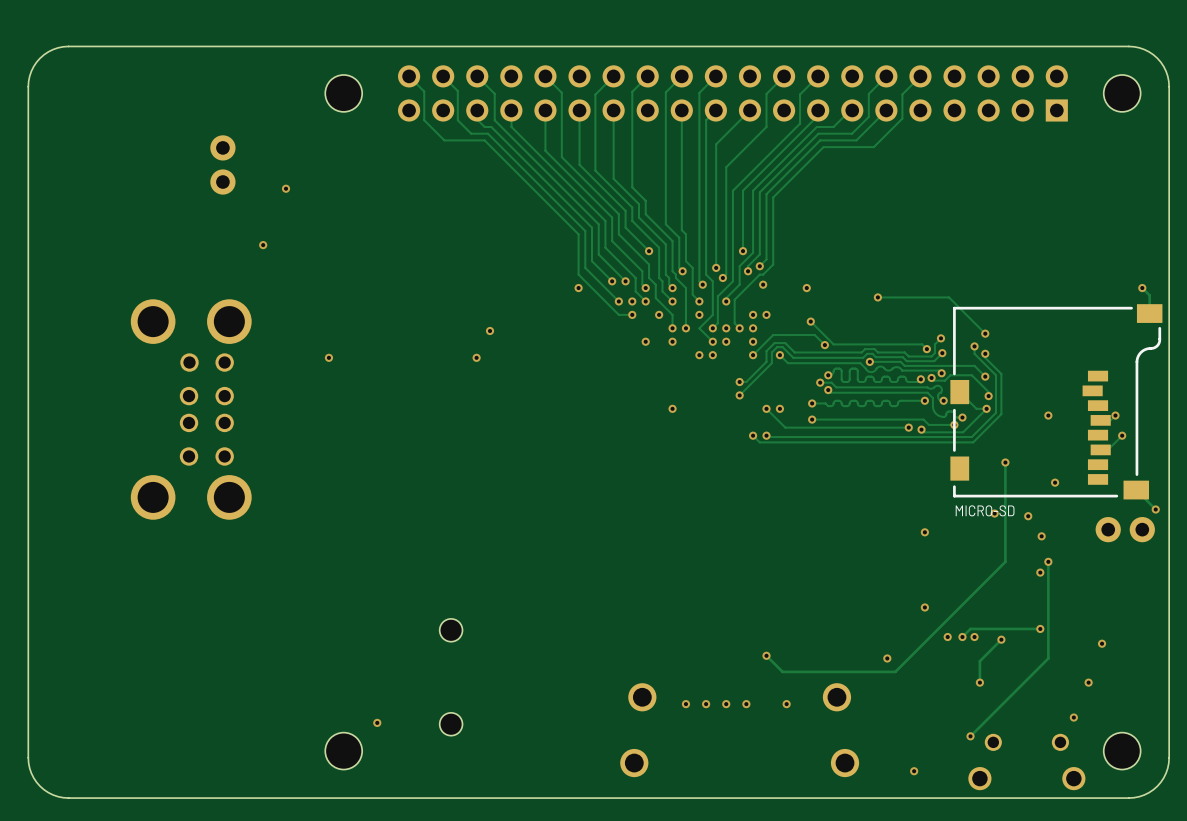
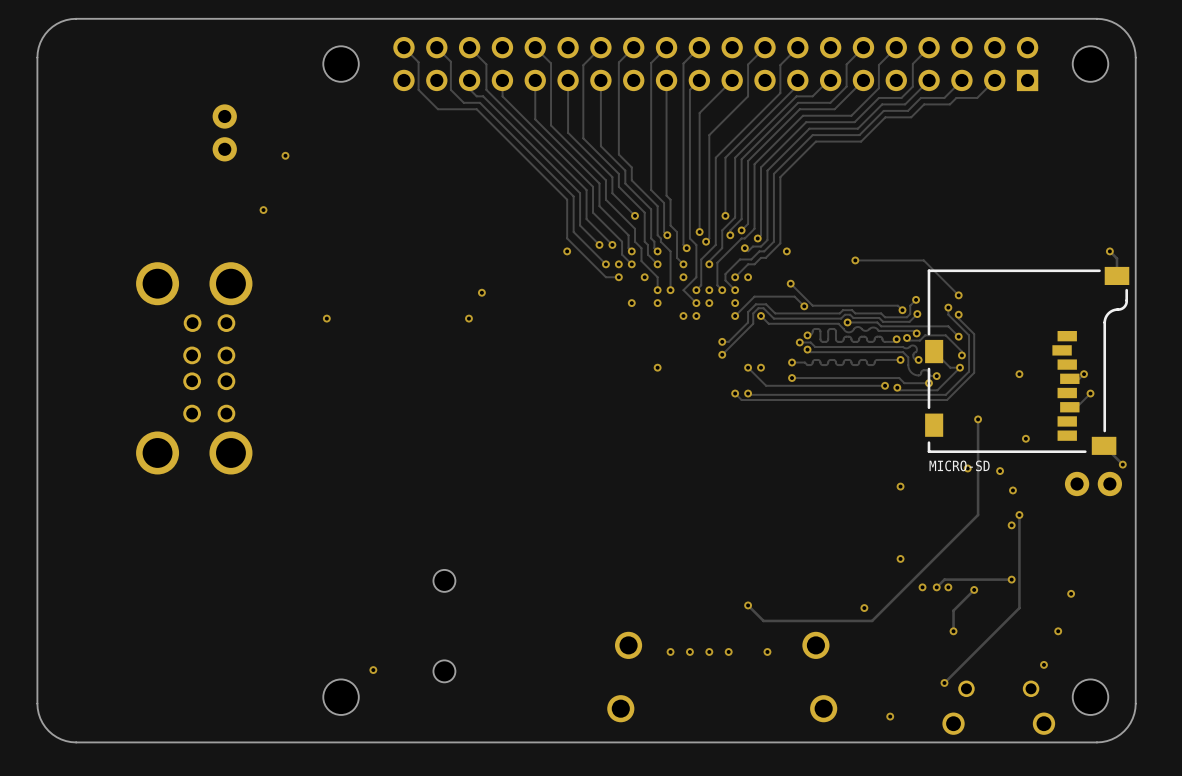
track: none -> (929, 47) (912, 63) (912, 86) (901, 97) (878, 97) (854, 122) (806, 122) (761, 167) (761, 235) (757, 238)
track: none -> (929, 80) (905, 104) (882, 104) (857, 128) (809, 128) (767, 170) (767, 240) (761, 246) (752, 246) (748, 251)
track: none -> (961, 80) (944, 97) (920, 97) (907, 110) (883, 110) (859, 135) (812, 135) (773, 173) (773, 241) (764, 251) (759, 251) (751, 259) (740, 259) (725, 274) (725, 280) (735, 290)
track: none -> (994, 80) (977, 97) (956, 97) (949, 104) (924, 104) (911, 117) (885, 117) (861, 141) (815, 141) (780, 177) (780, 243) (765, 257) (761, 257) (754, 264) (748, 264) (735, 277)
via: none -> (757, 238)

